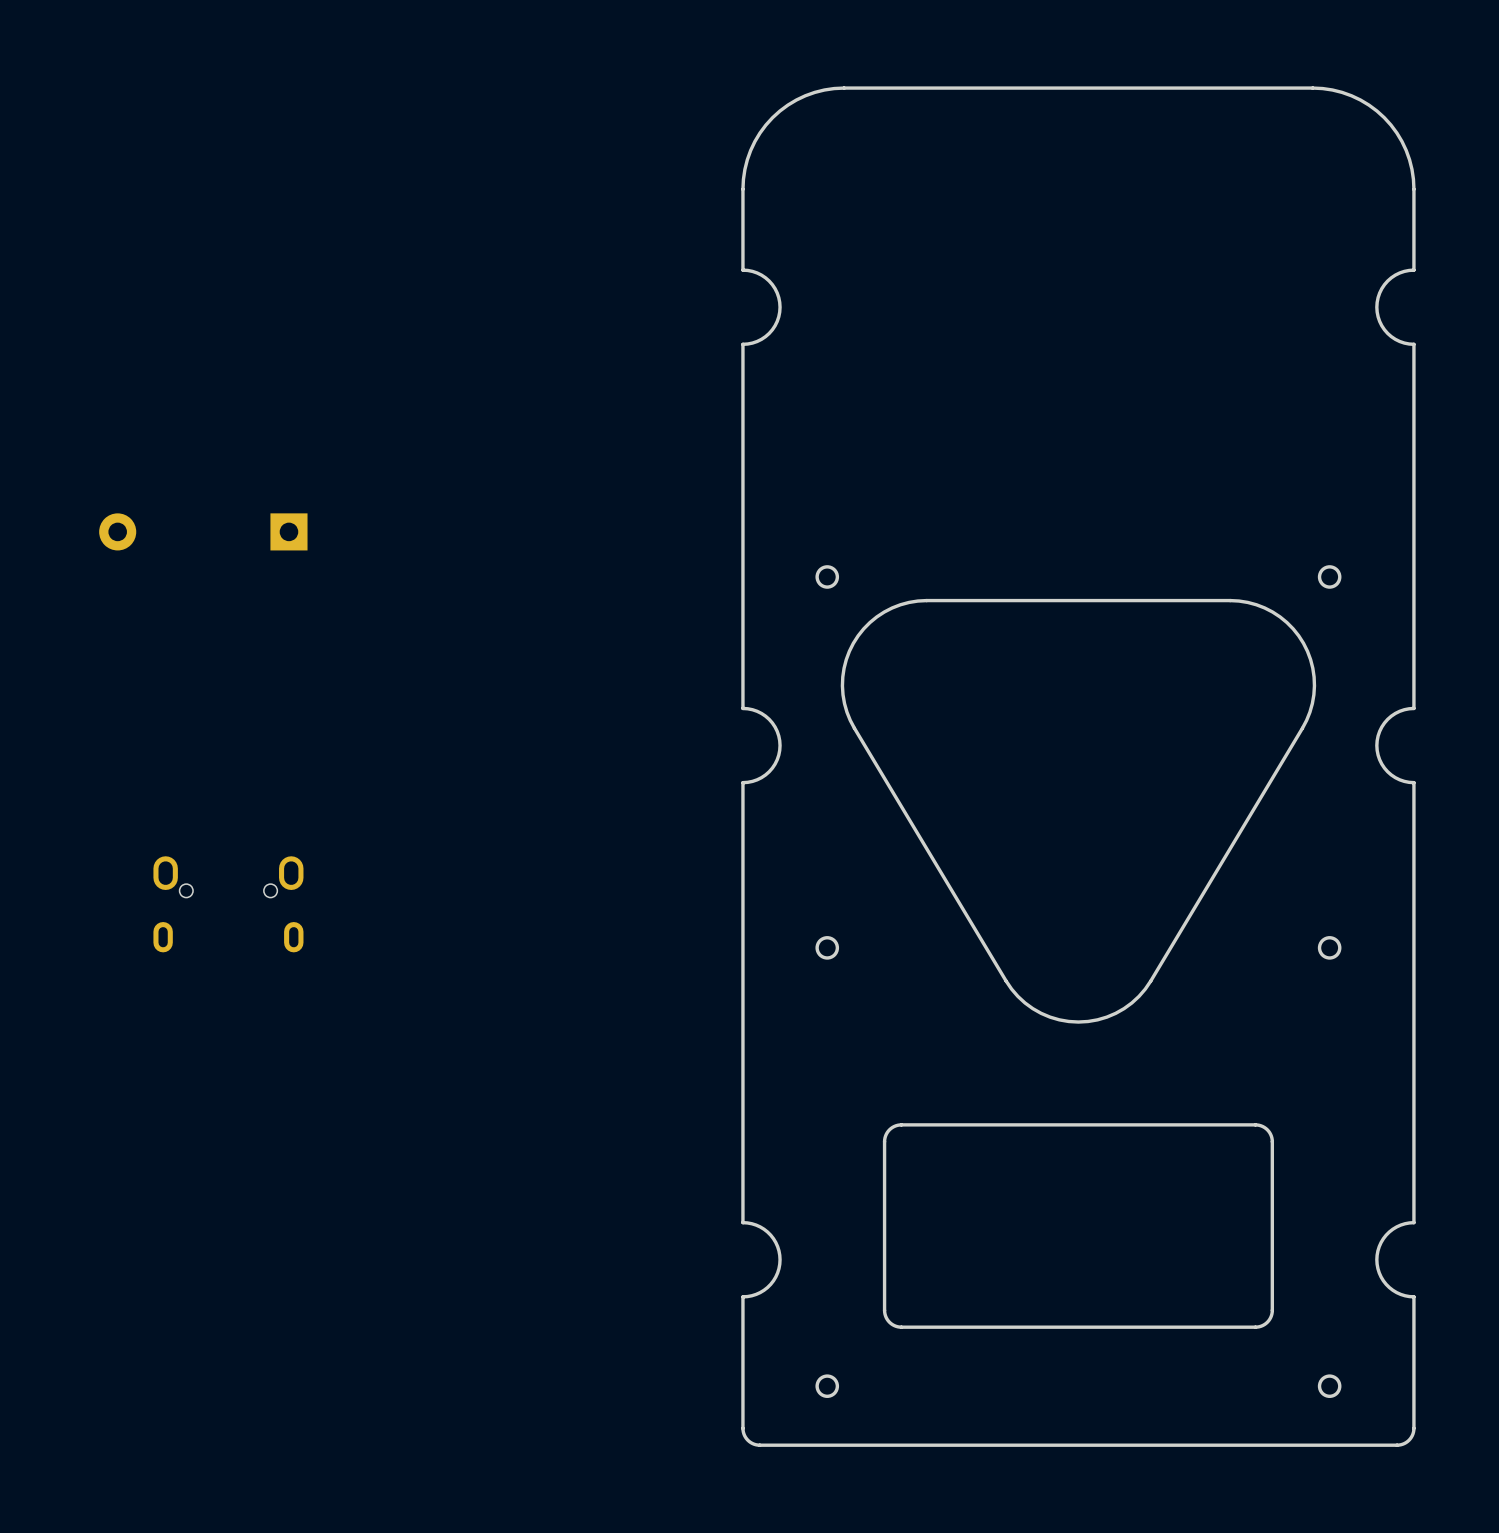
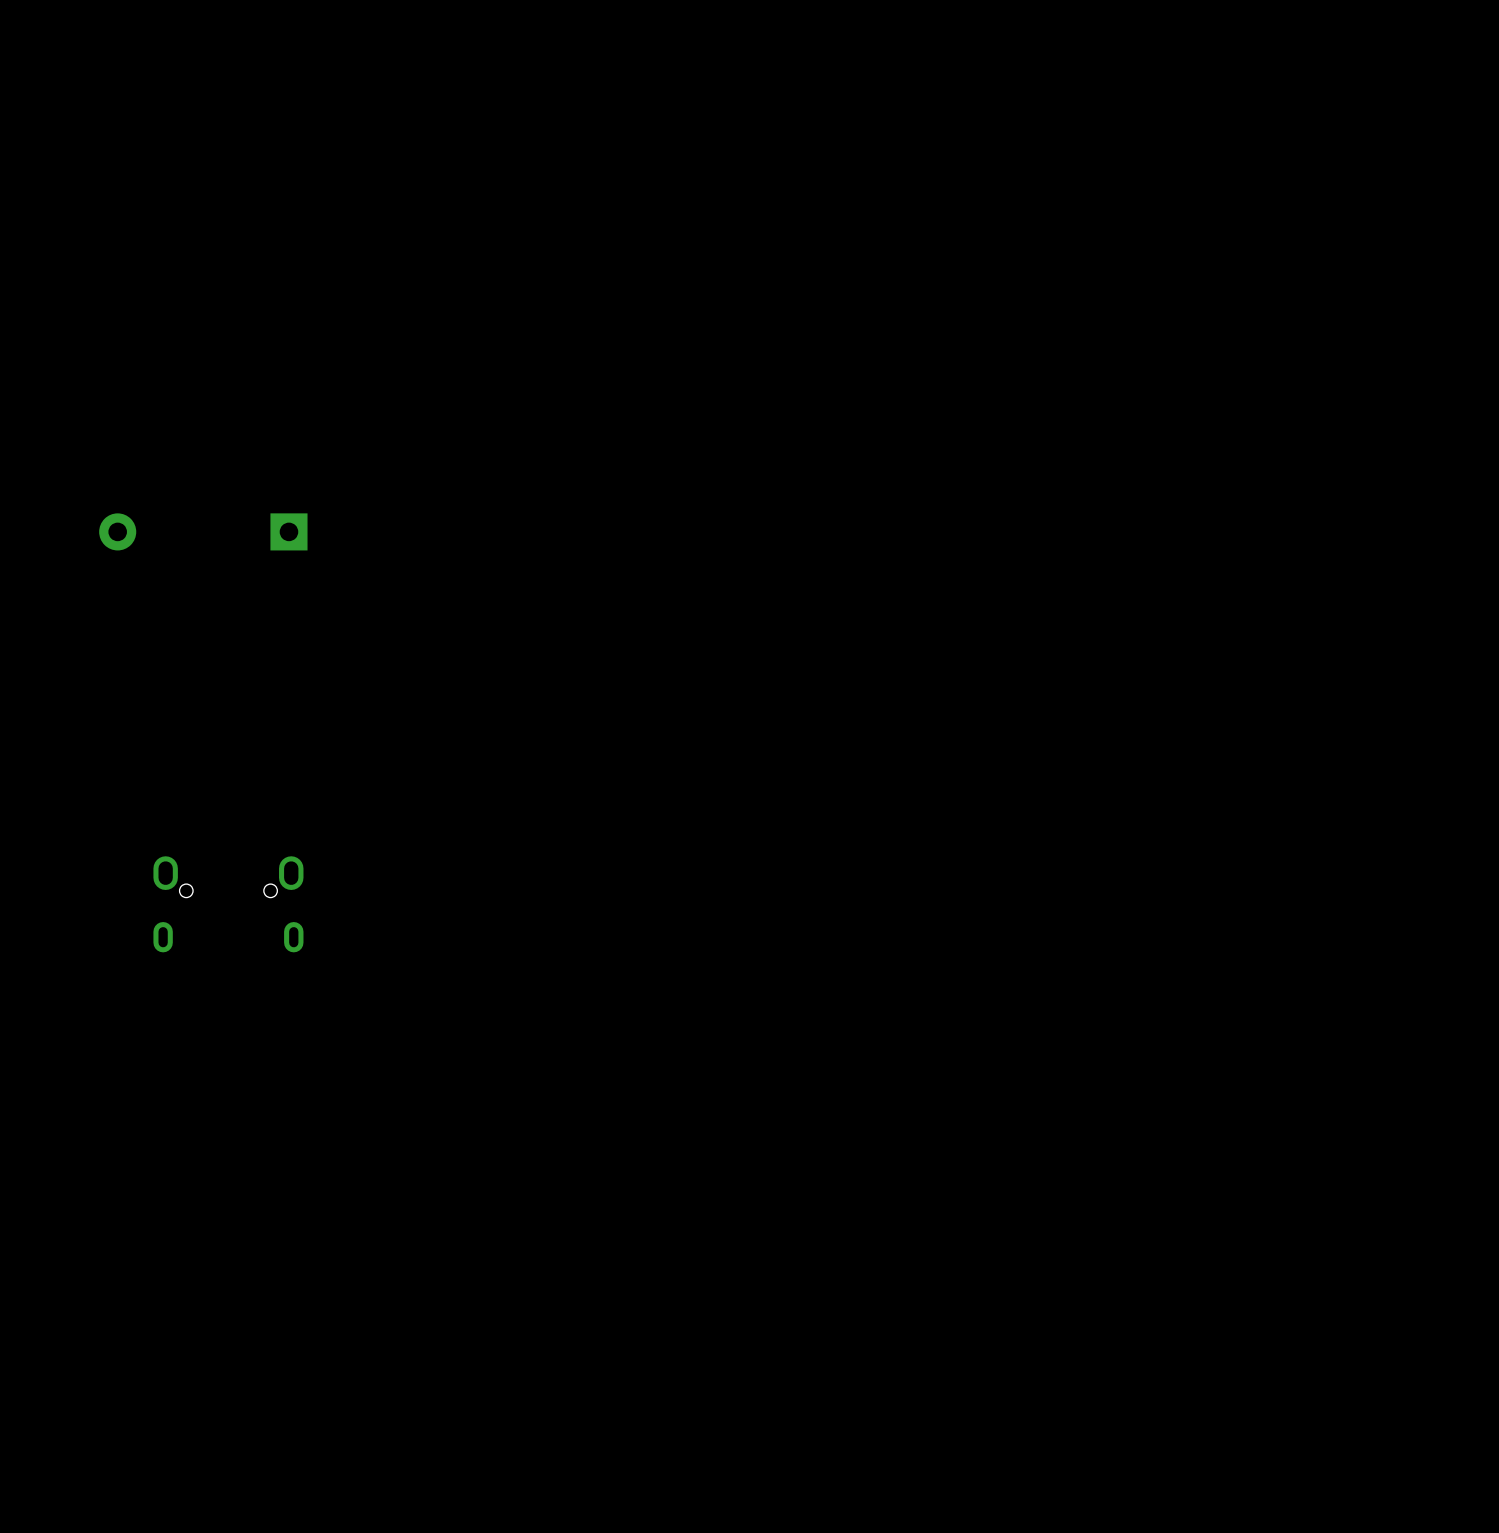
board edge: (1312, 88) (834, 88) (805, 95) (779, 111) (765, 125) (750, 150) (743, 179) (742, 270) (757, 272) (769, 281) (777, 293) (780, 307) (777, 321) (769, 333) (757, 341) (742, 344) (742, 708) (757, 711) (769, 719) (777, 731) (780, 745) (777, 759) (769, 771) (757, 779) (742, 782) (742, 1222) (760, 1226) (770, 1235) (777, 1246) (780, 1259) (775, 1276) (767, 1287) (756, 1294) (742, 1296) (743, 1430) (746, 1438) (754, 1444) (1397, 1445) (1407, 1441) (1412, 1433) (1413, 1296) (1396, 1292) (1386, 1284) (1379, 1272) (1376, 1259) (1379, 1246) (1386, 1235) (1396, 1226) (1413, 1222) (1413, 782) (1399, 779) (1387, 771) (1379, 759) (1376, 745) (1379, 731) (1387, 719) (1399, 711) (1413, 708) (1413, 344) (1399, 341) (1387, 333) (1379, 321) (1376, 307) (1379, 293) (1387, 281) (1399, 272) (1413, 270) (1413, 179) (1409, 159) (1401, 141) (1390, 125) (1376, 111) (1360, 100) (1342, 92) (1312, 88) -> none
round board edge: [815, 565, 840, 589] -> none
round board edge: [1317, 565, 1342, 589] -> none
board edge: (1230, 600) (917, 601) (900, 604) (876, 616) (858, 635) (849, 651) (844, 668) (842, 685) (844, 703) (850, 720) (1006, 981) (1024, 1002) (1041, 1013) (1068, 1021) (1097, 1019) (1124, 1008) (1138, 996) (1150, 981) (1306, 720) (1312, 703) (1314, 685) (1310, 659) (1303, 643) (1286, 622) (1272, 612) (1256, 604) (1230, 600) -> none
round board edge: [815, 936, 840, 960] -> none
round board edge: [1317, 936, 1342, 960] -> none
board edge: (1255, 1124) (901, 1124) (894, 1126) (887, 1132) (884, 1141) (884, 1310) (886, 1317) (892, 1324) (901, 1327) (1255, 1327) (1262, 1325) (1269, 1319) (1272, 1310) (1272, 1141) (1267, 1129) (1255, 1124) -> none
round board edge: [815, 1374, 840, 1398] -> none
round board edge: [1317, 1374, 1342, 1398] -> none

